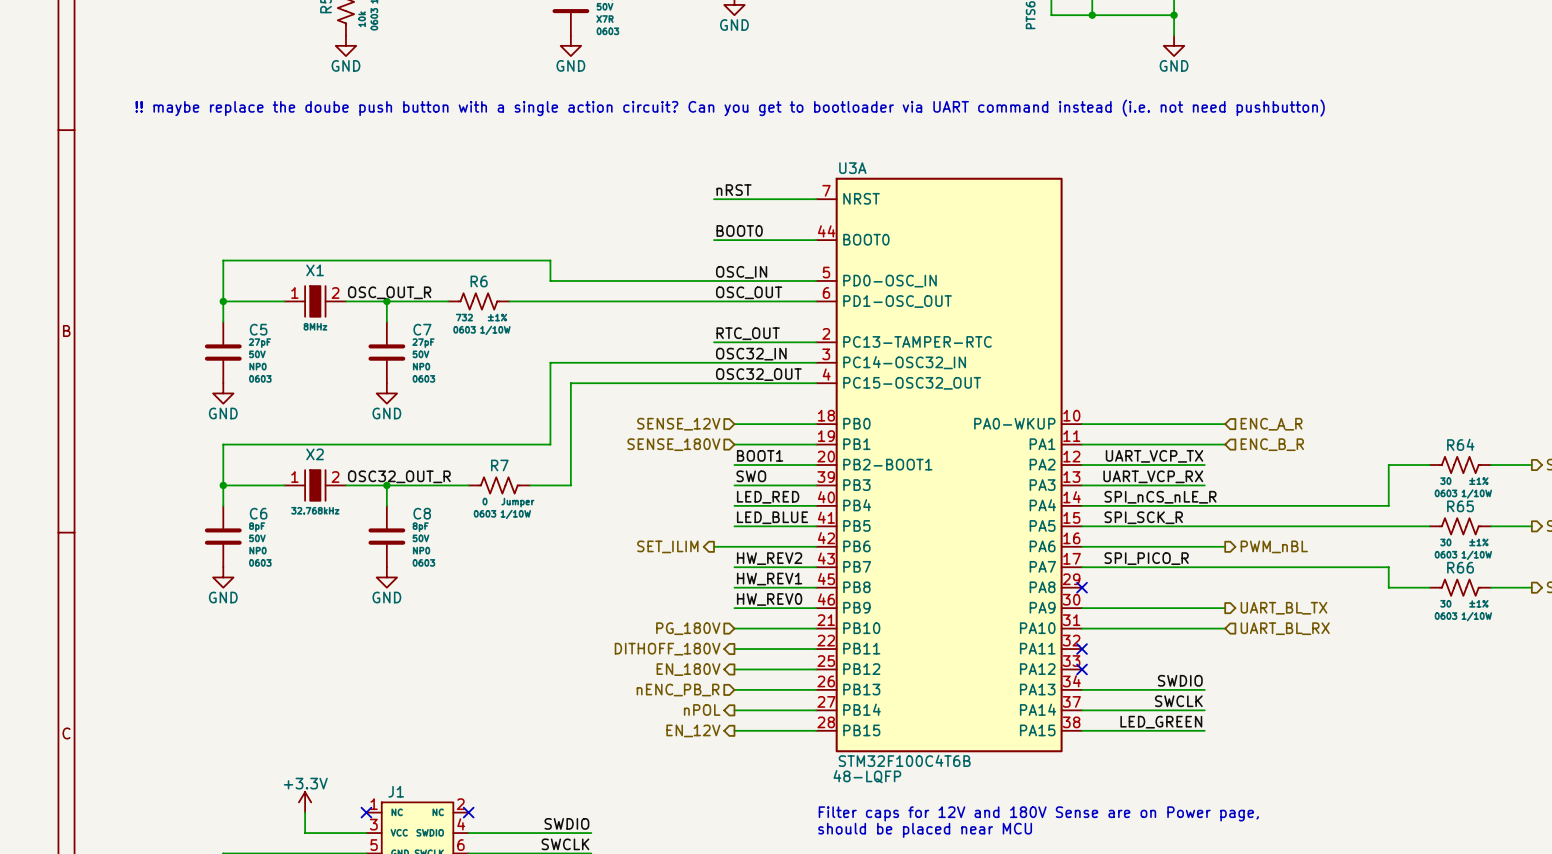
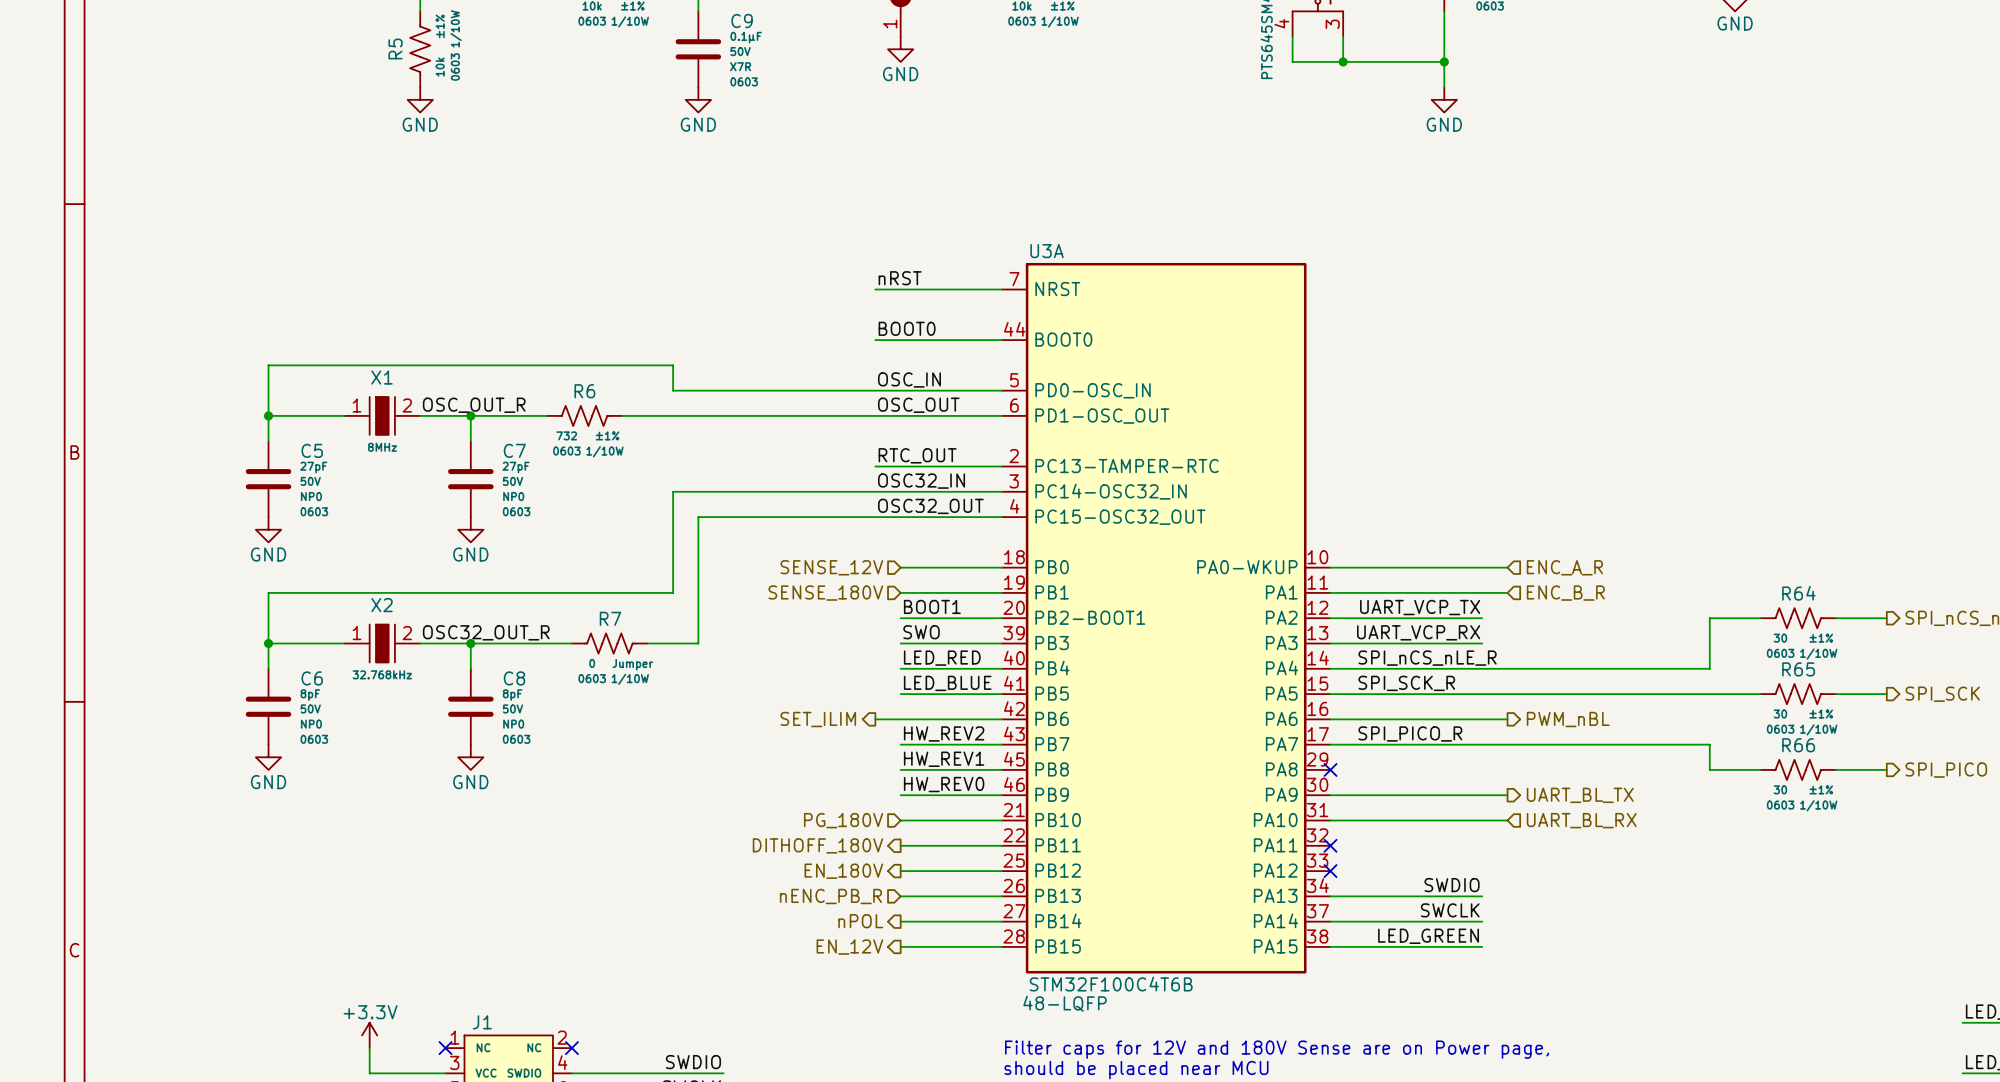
text: !! maybe replace the doube push button with a single action circuit? Can you get to bootloader via UART command instead (i.e. not need pushbutton) (730, 108) -> none

